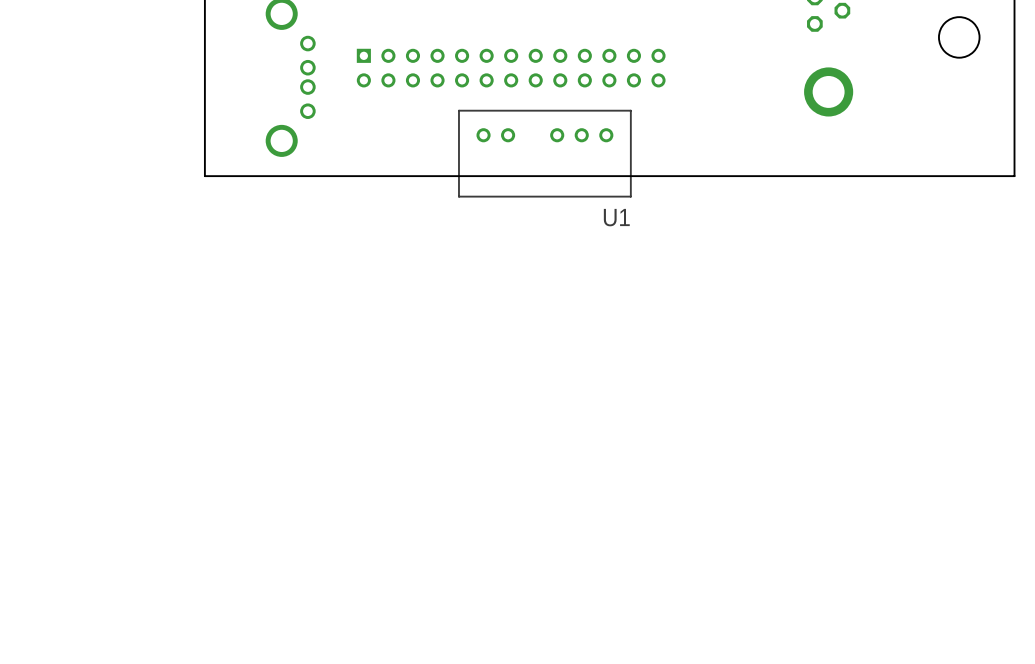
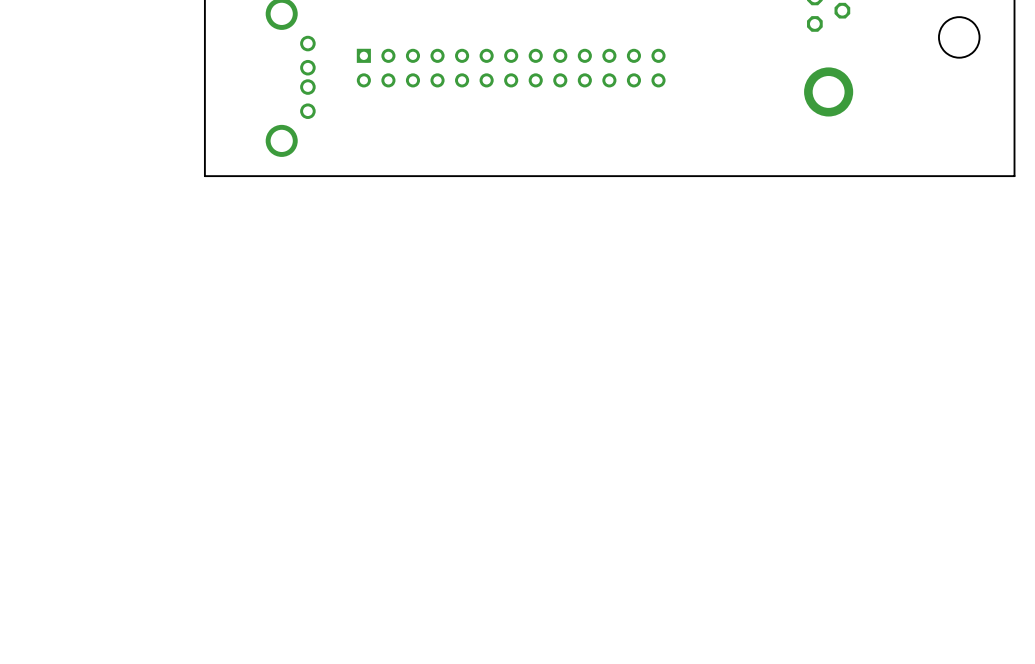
U1: (544, 153) -> none

